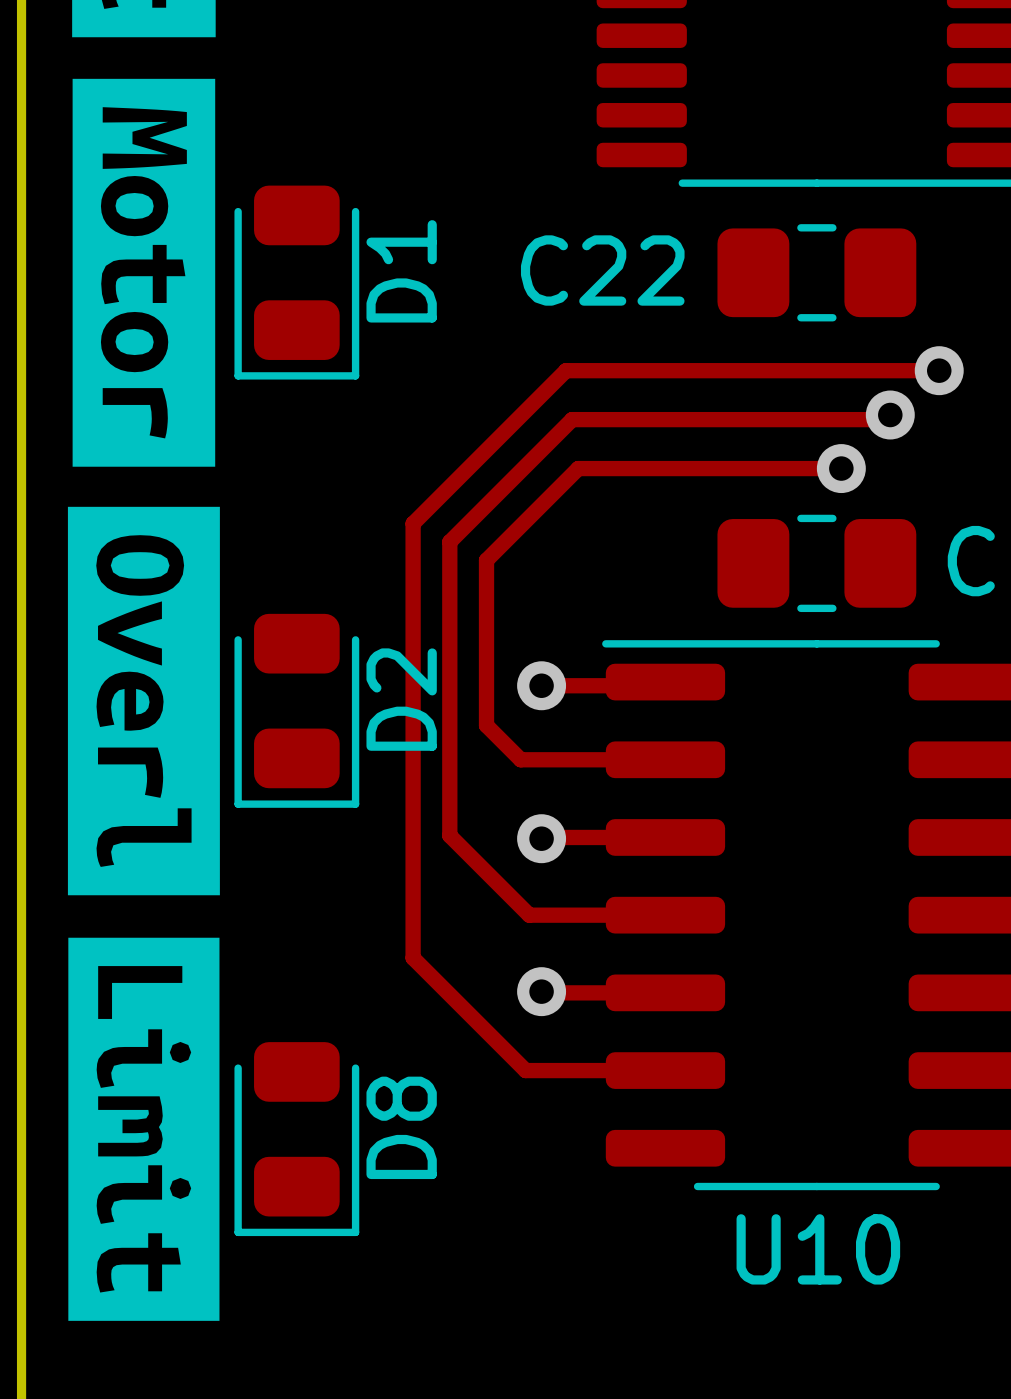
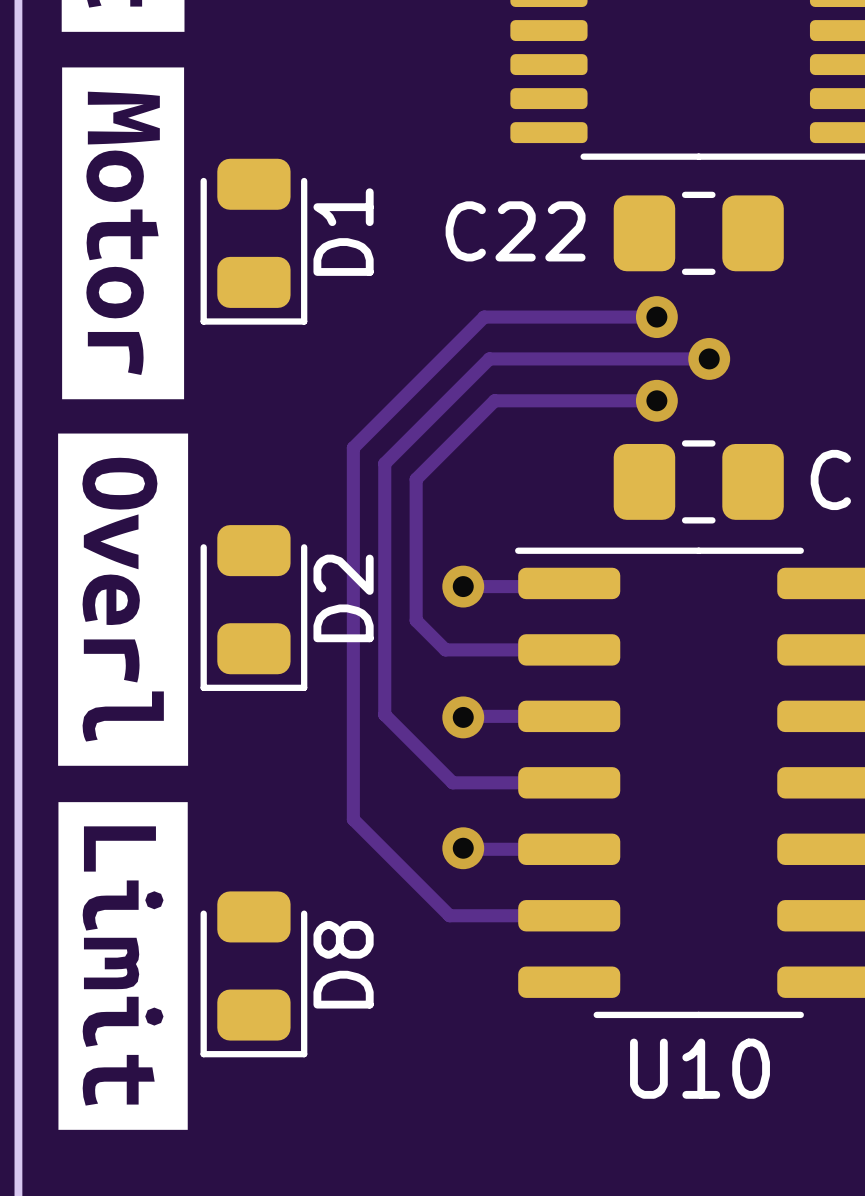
track: (767, 370) (939, 370) -> none
via: none -> (656, 317)
via: (939, 370) -> none
track: (890, 415) (885, 419) (829, 419) -> none
via: (890, 415) -> none
track: (767, 468) (841, 468) -> none
via: none -> (656, 400)
via position: (841, 468) -> (709, 358)

